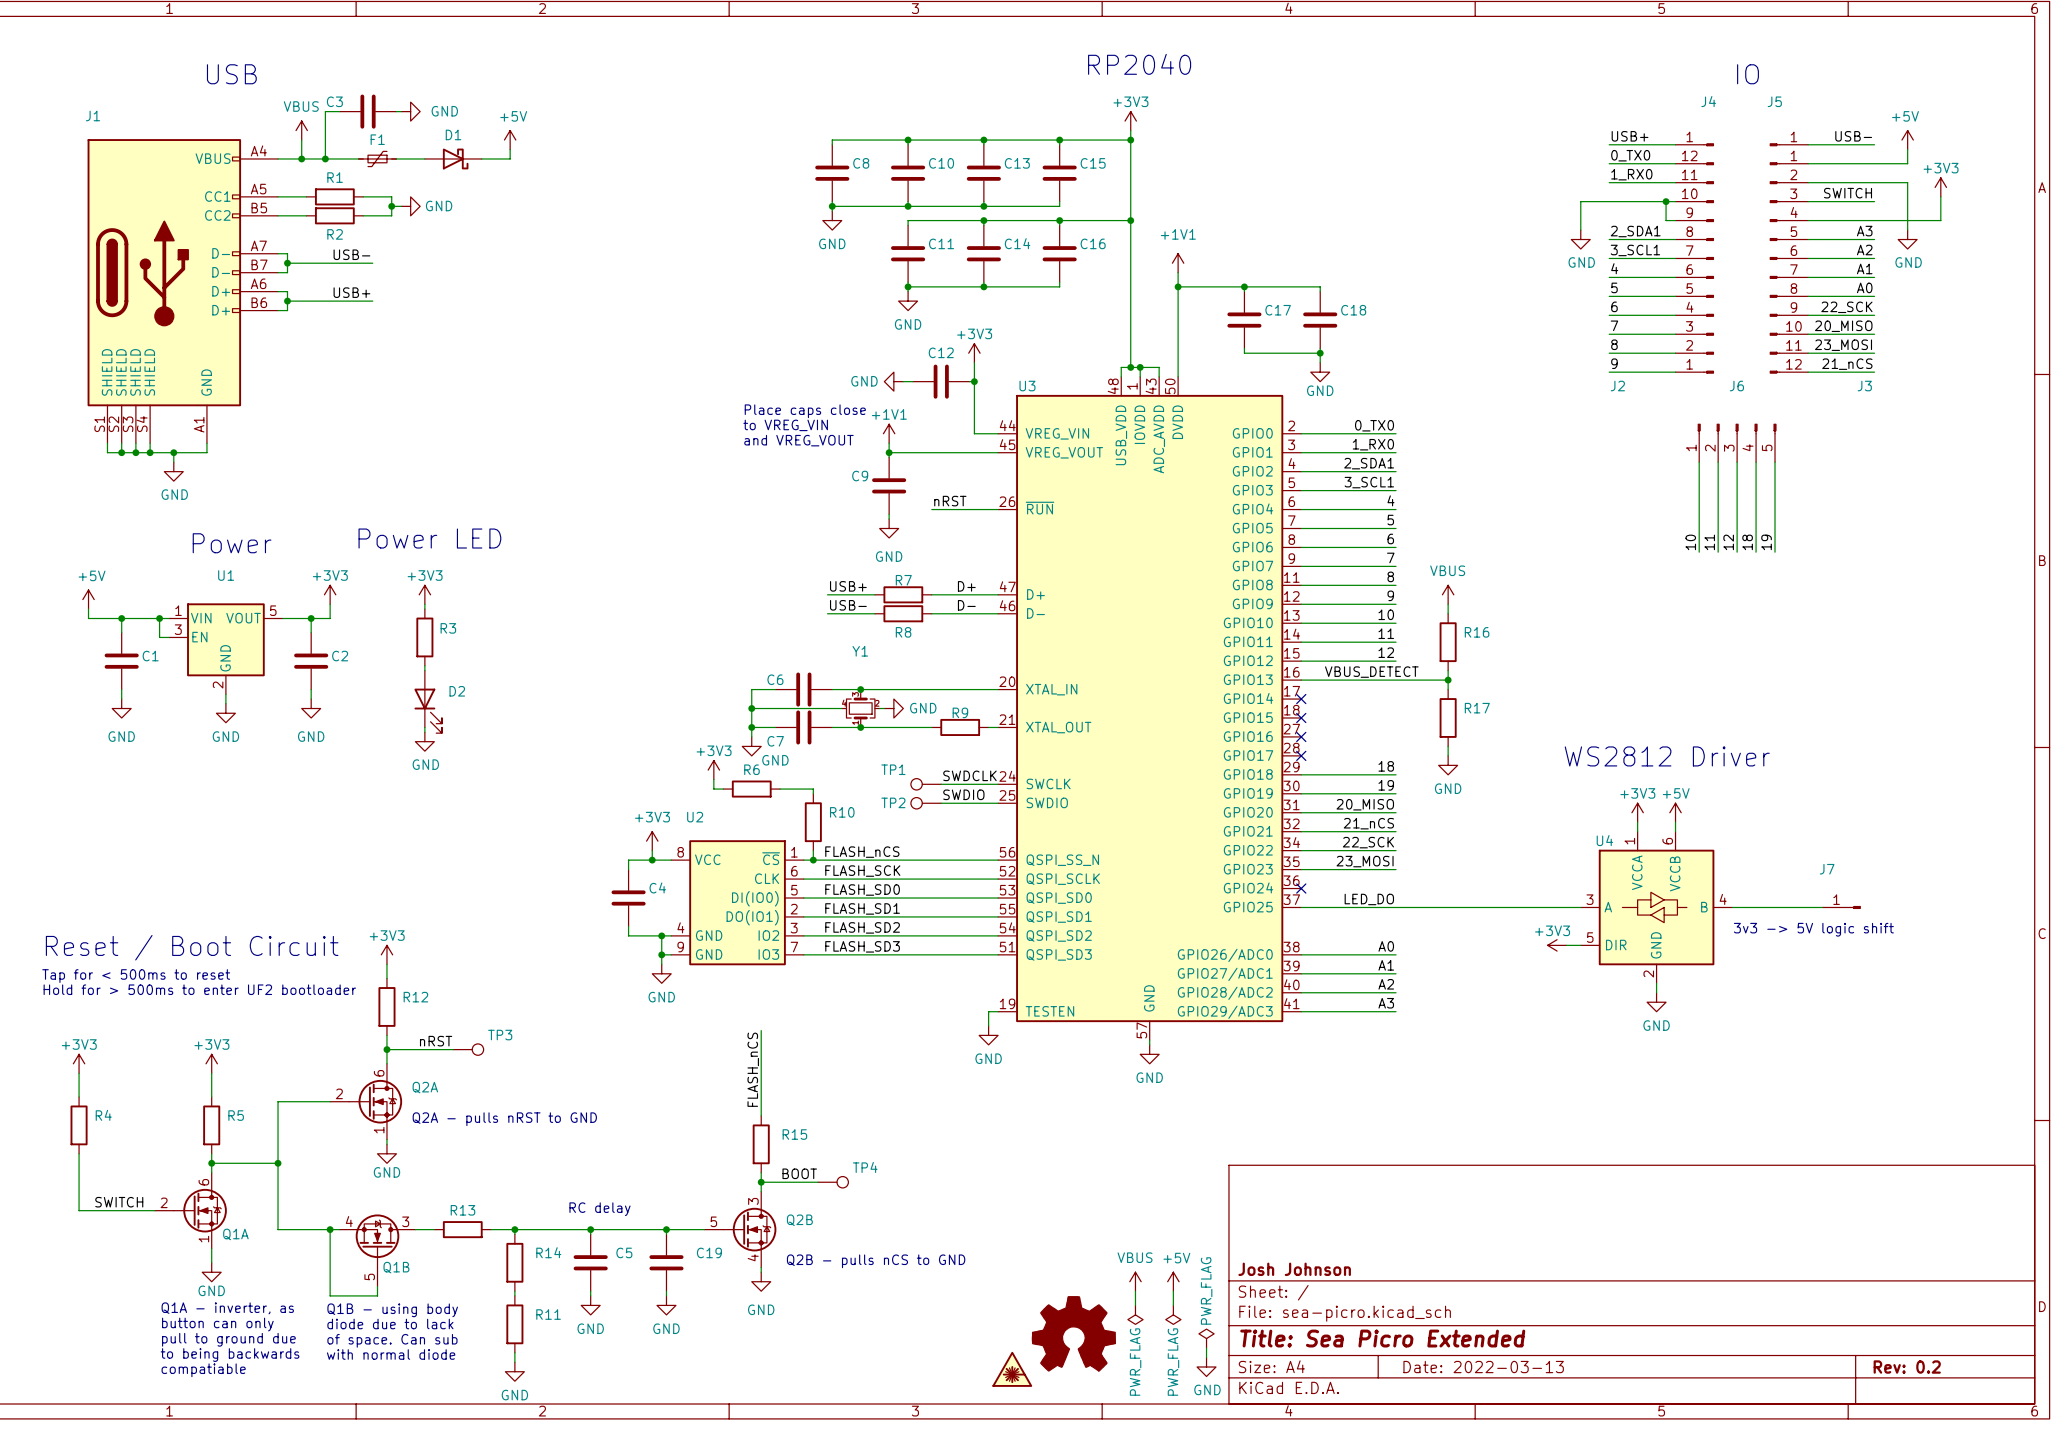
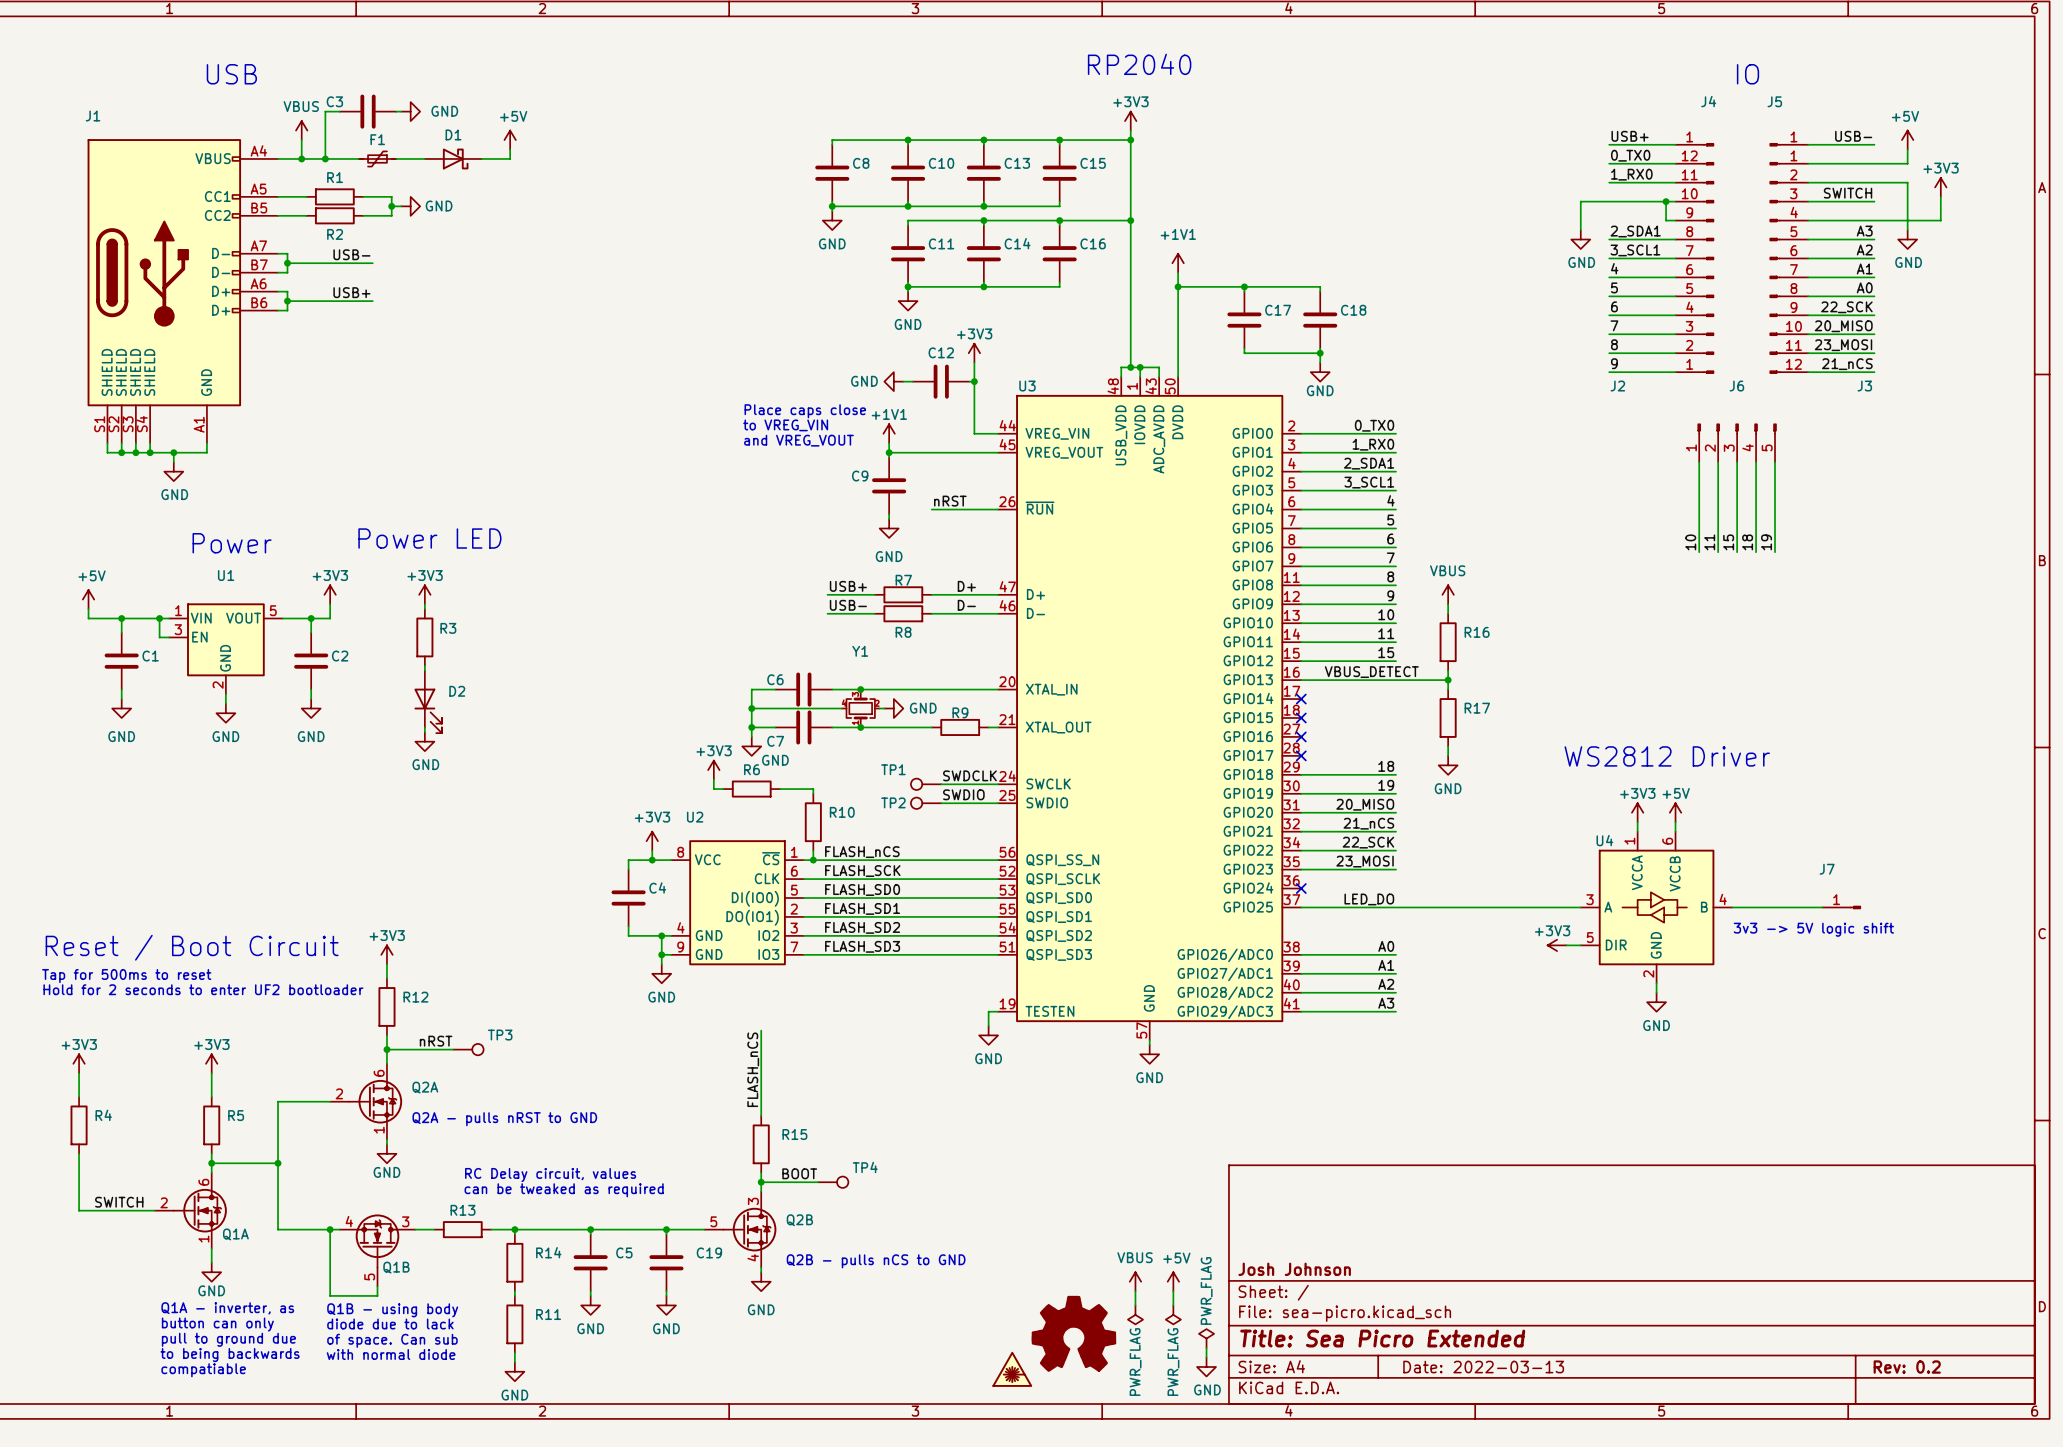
label: 12 (1728, 542) -> 15 (1728, 542)
label: 12 (1386, 652) -> 15 (1386, 652)
text: Tap for < 500ms to reset (136, 976) -> Tap for 500ms to reset (126, 976)
text: Hold for > 500ms to enter UF2 bootloader (199, 989) -> Hold for 2 seconds to enter UF2 bootloader (203, 989)
text: none -> RC Delay circuit, values (550, 1175)
text: none -> can be tweaked as required (564, 1190)
text: RC delay (600, 1209) -> none

